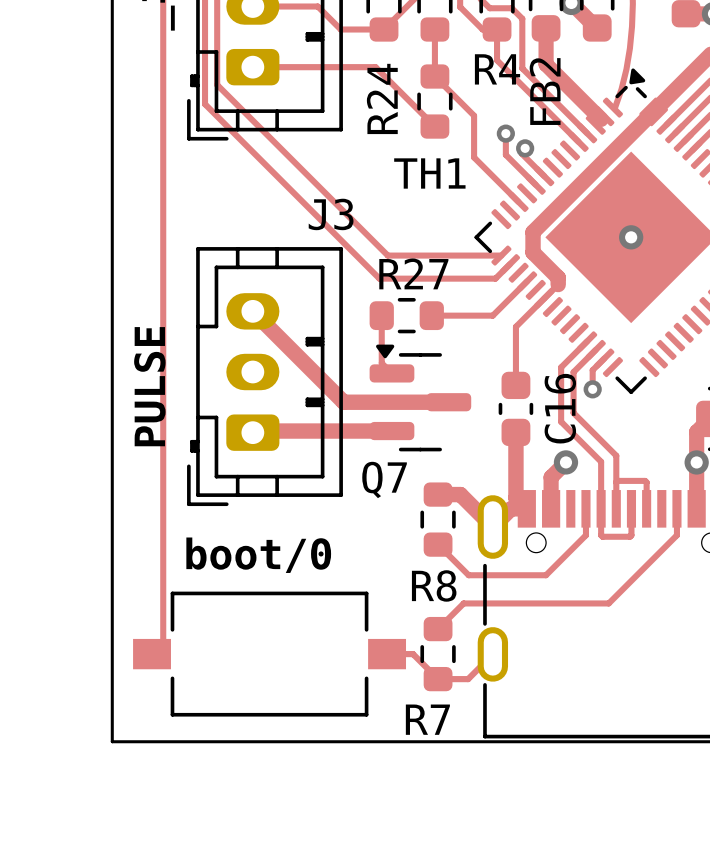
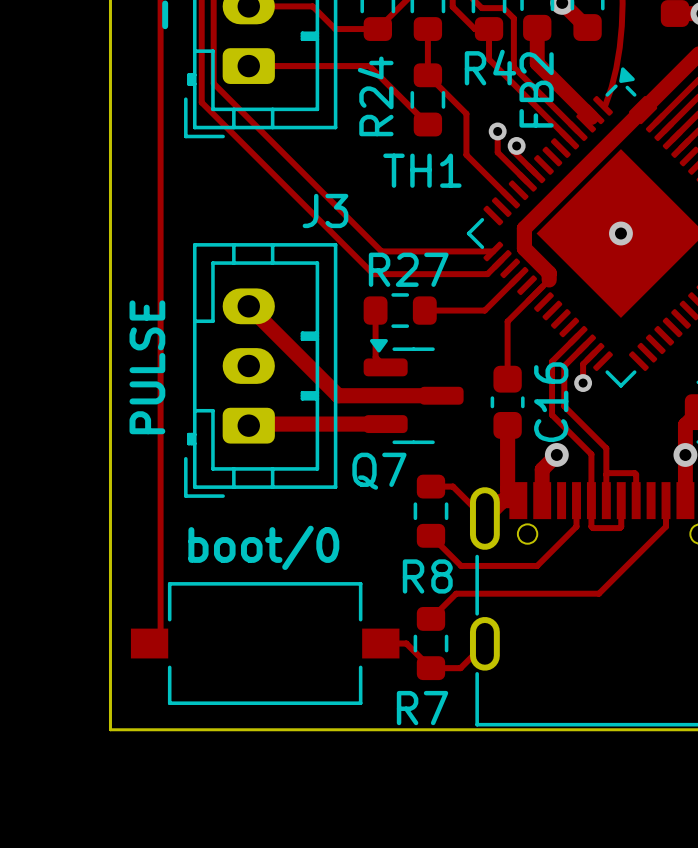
track width: thick (438, 494) (460, 494) (492, 527) -> thin (430, 486) (452, 486) (484, 518)

